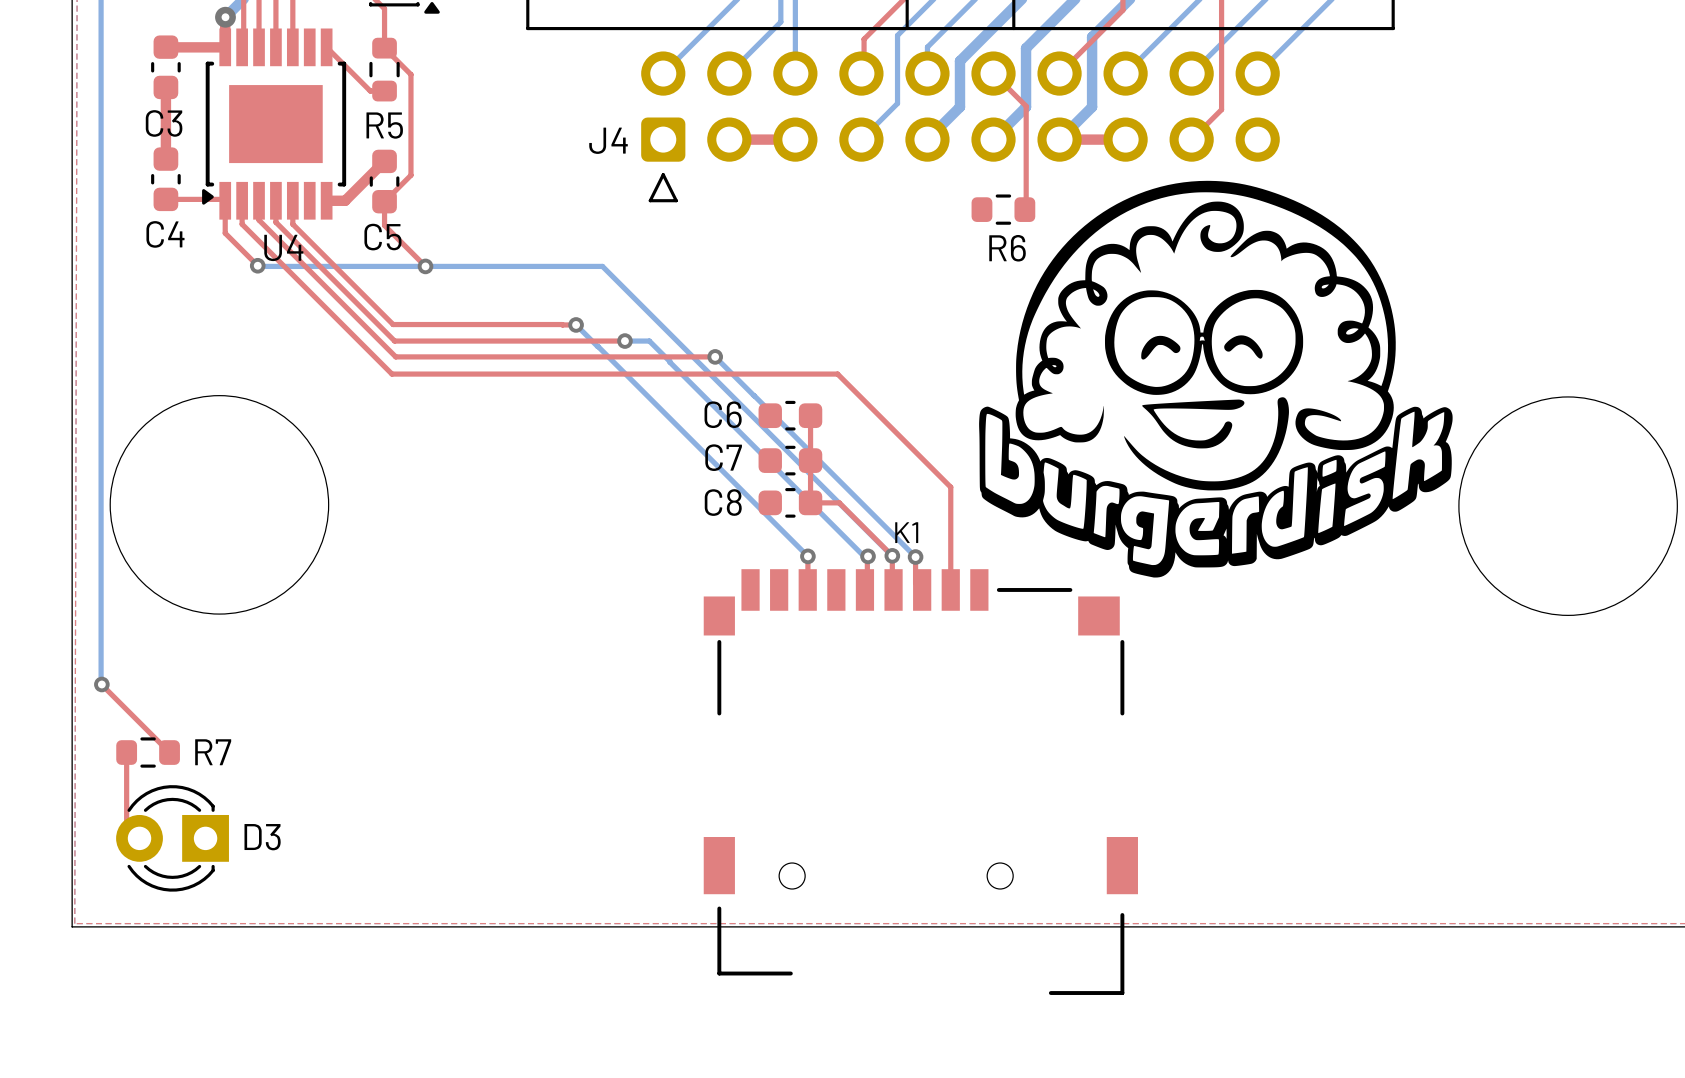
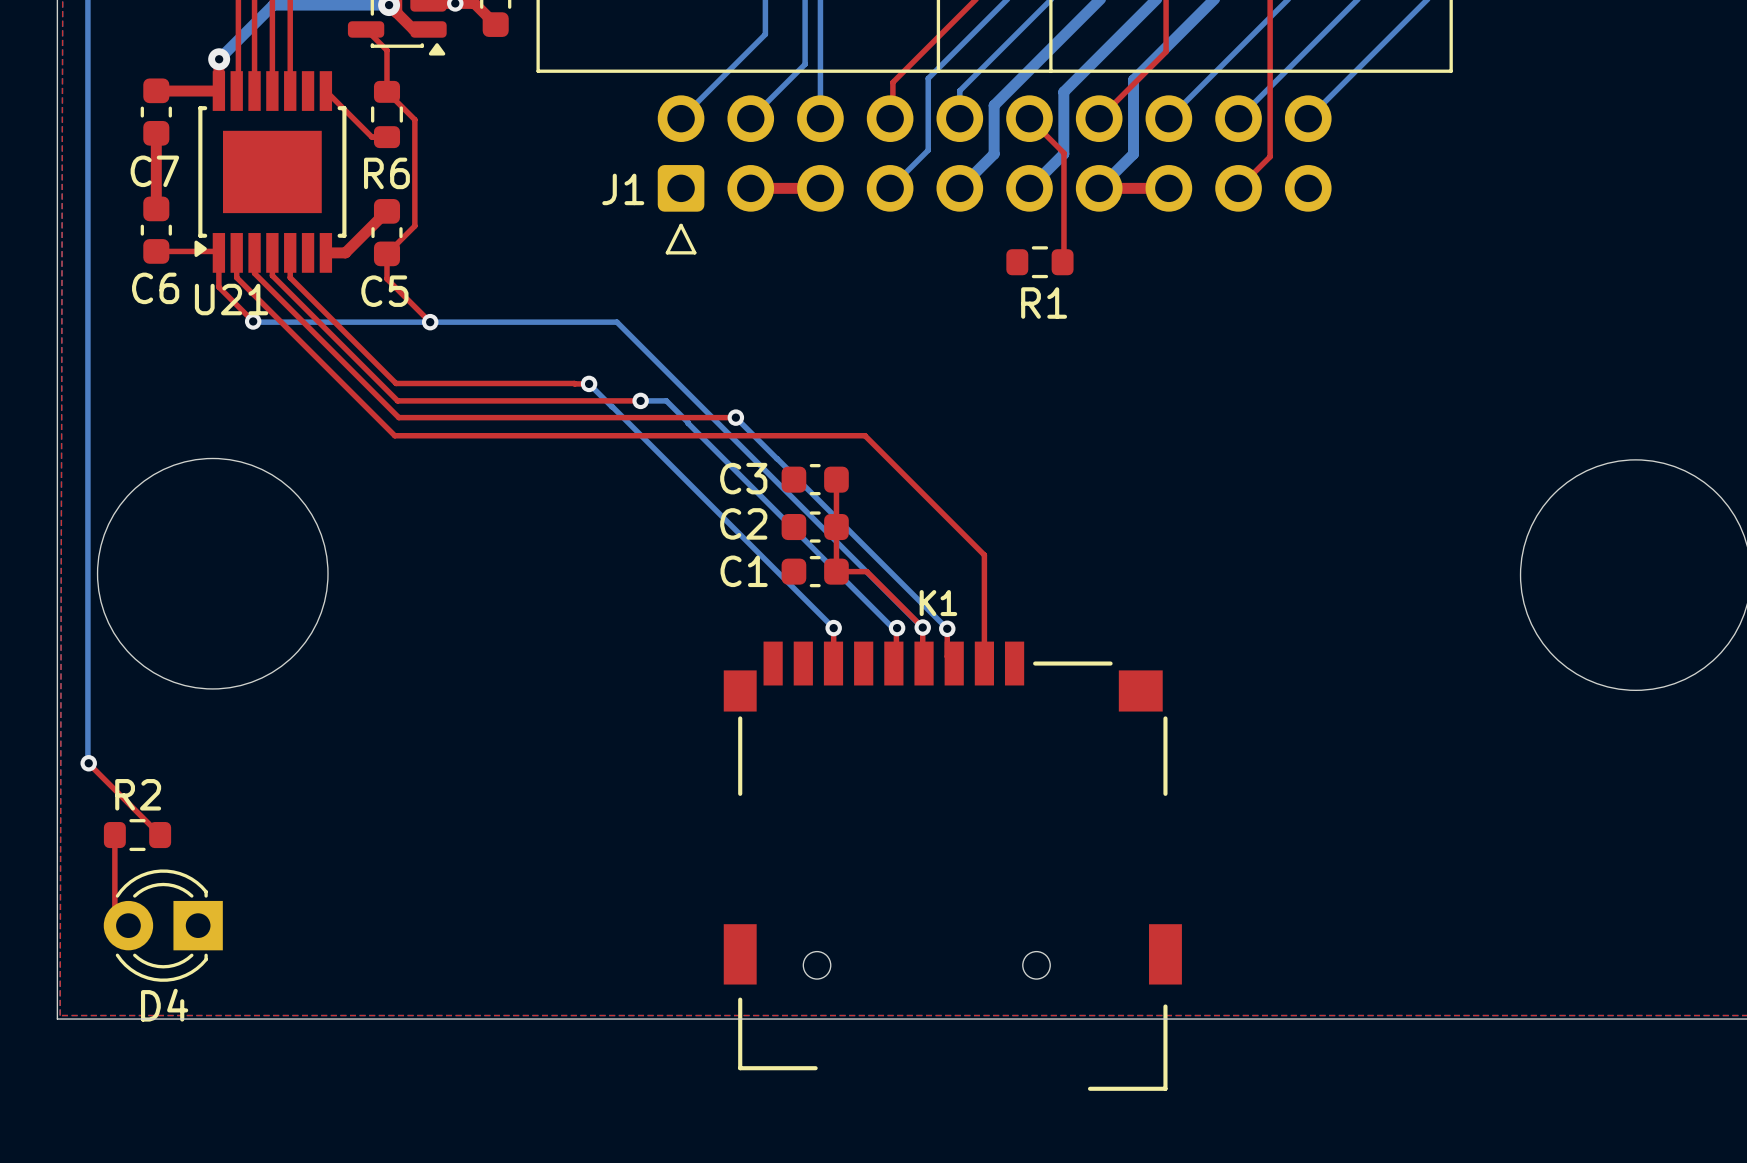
C3 name: C3 (164, 123) -> C7 (154, 171)
R5 name: R5 (384, 125) -> R6 (386, 173)
J4 name: J4 (608, 140) -> J1 (623, 189)
drawing: [979, 180, 1453, 578] -> none
C4 name: C4 (165, 234) -> C6 (155, 288)
U4 name: U4 (283, 247) -> U21 (231, 299)
R6 name: R6 (1007, 248) -> R1 (1044, 303)
C6 name: C6 (723, 414) -> C3 (743, 478)
C7 name: C7 (723, 457) -> C2 (743, 523)
C8 name: C8 (723, 502) -> C1 (744, 571)
R7 name: R7 (213, 752) -> R2 (138, 794)
D3 name: D3 (262, 837) -> D4 (164, 1005)

